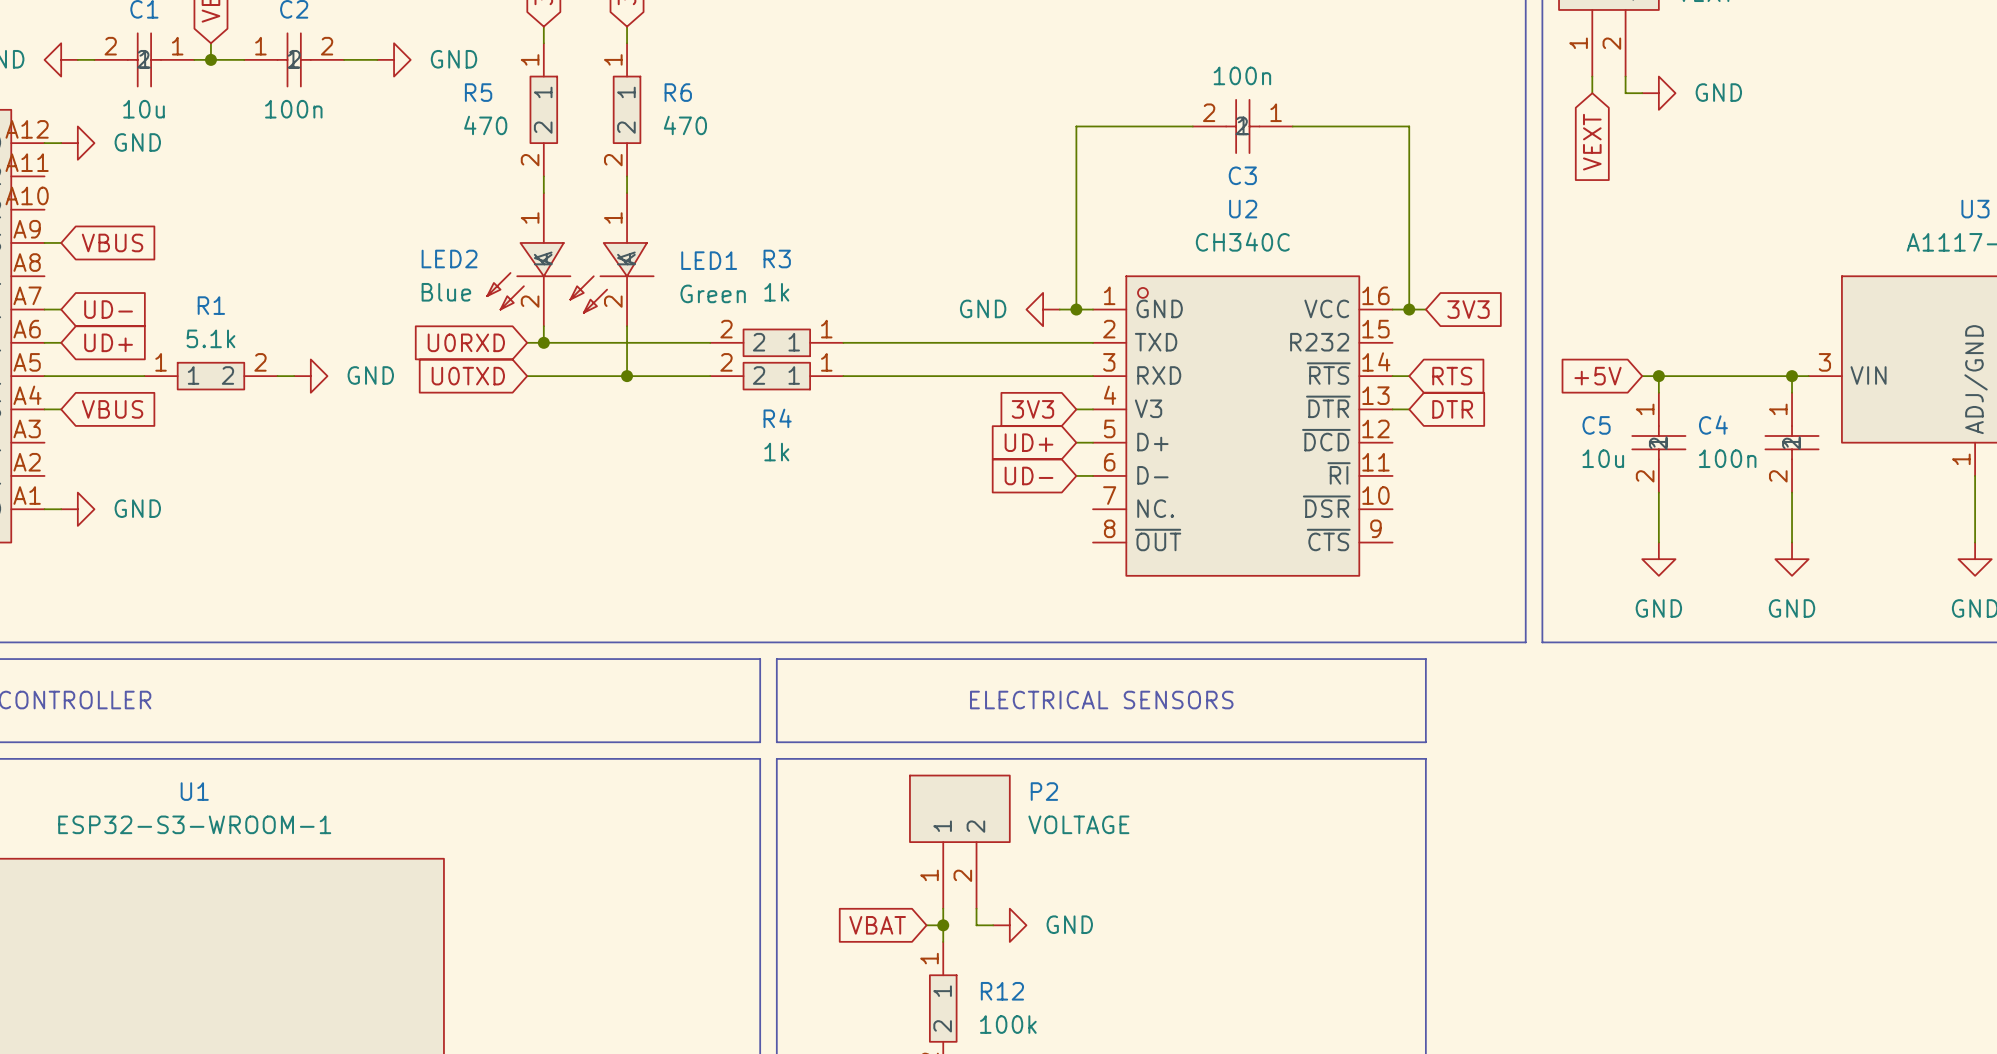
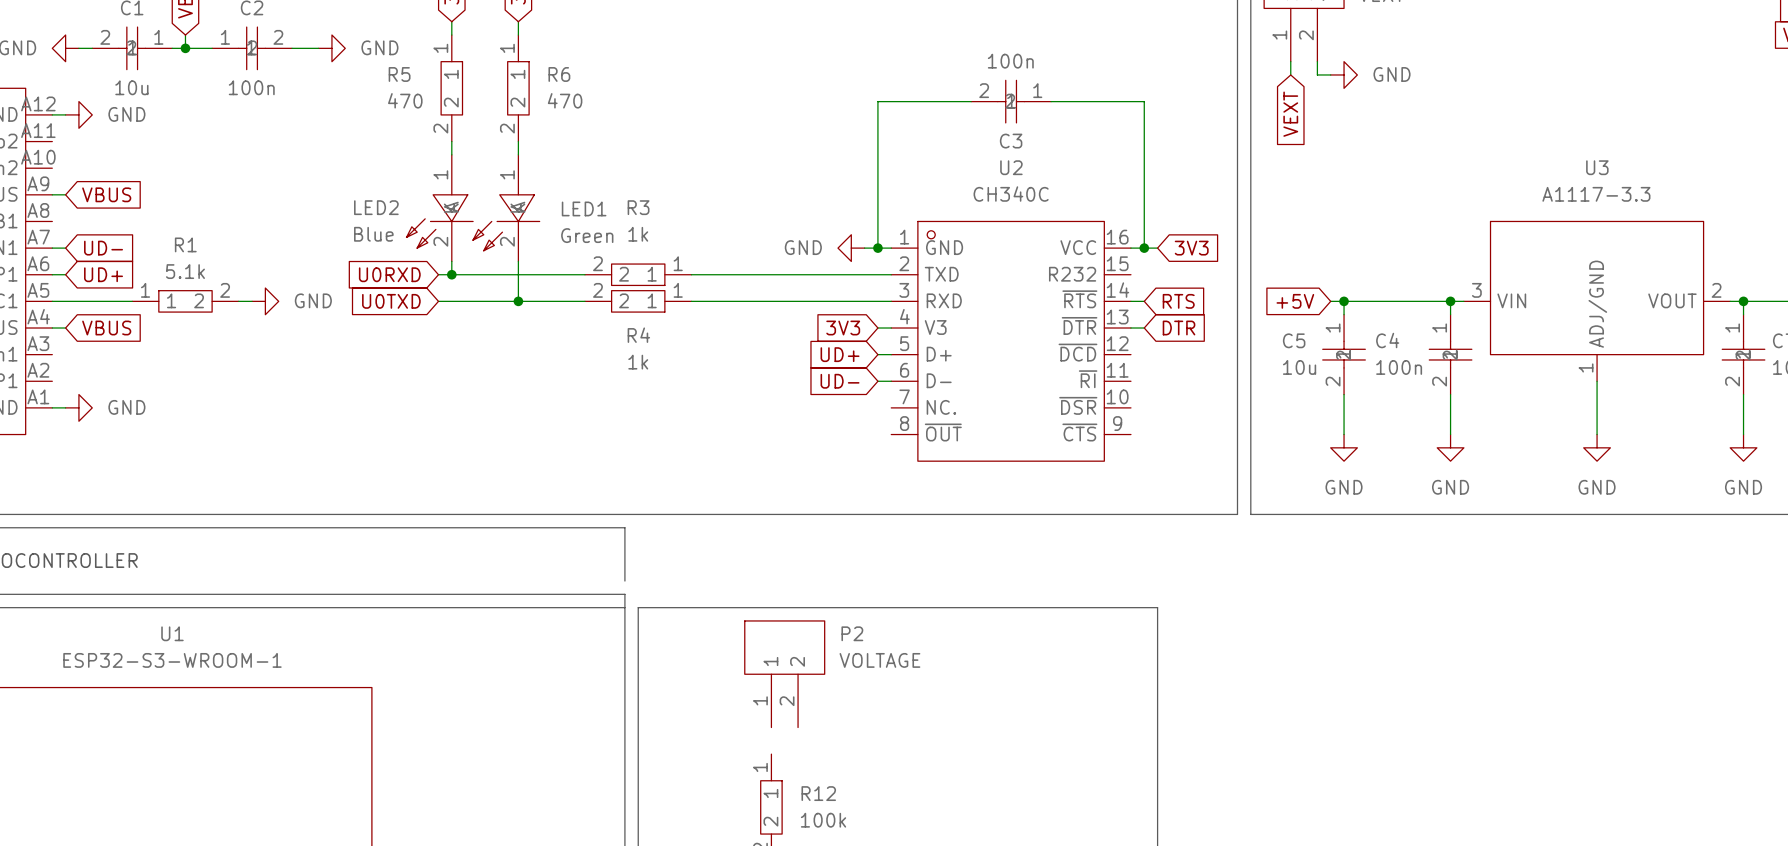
line: (776, 659) (776, 742) (1425, 742) (1425, 659) (776, 659) -> none
text: ELECTRICAL SENSORS (1101, 700) -> none
line: (760, 725) (760, 742) -> (624, 607) (624, 594)
wire: (943, 908) (943, 941) -> none
wire: (976, 908) (976, 925) (993, 925) -> none
global label: VBAT (877, 925) -> none
wire: (926, 925) (943, 925) -> none
junction: (943, 925) -> none
power symbol: GND (1009, 925) -> none

